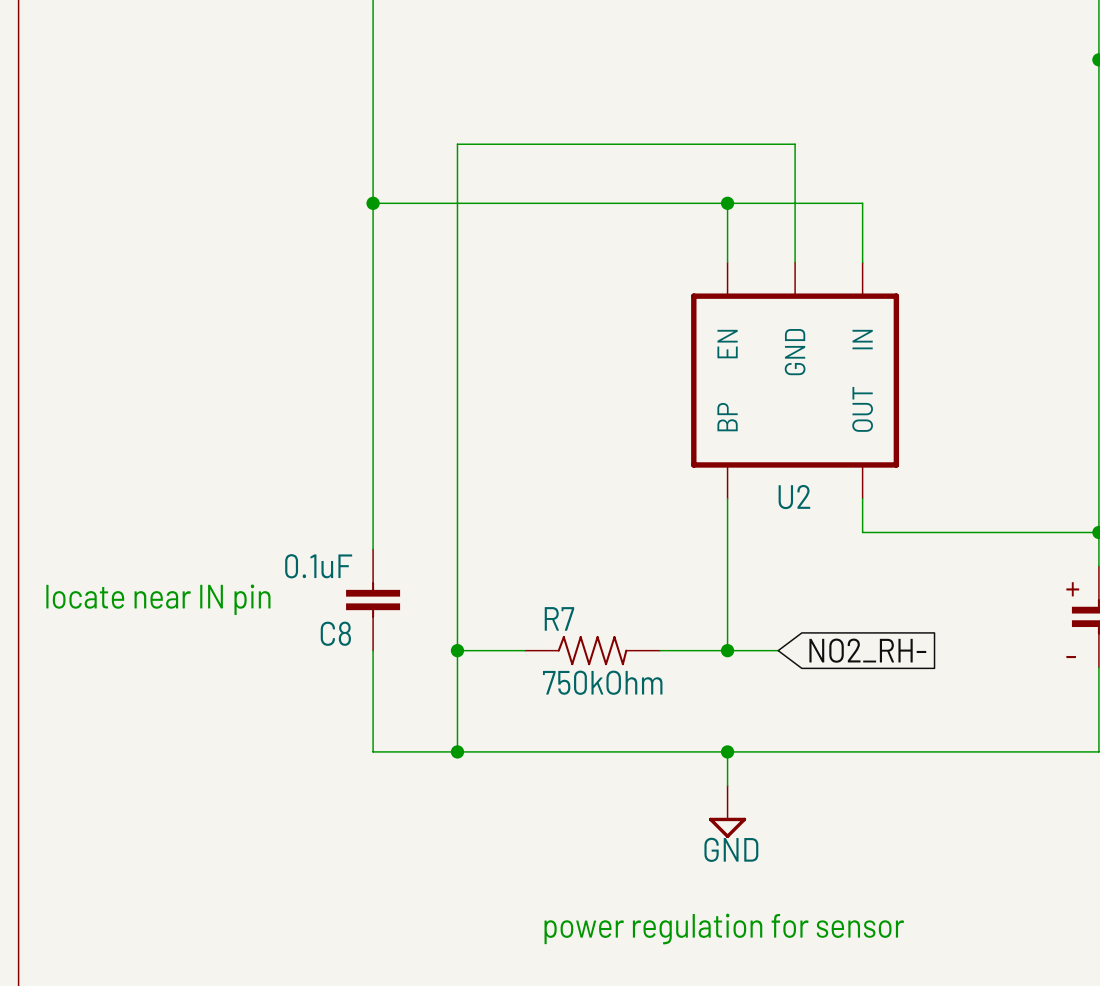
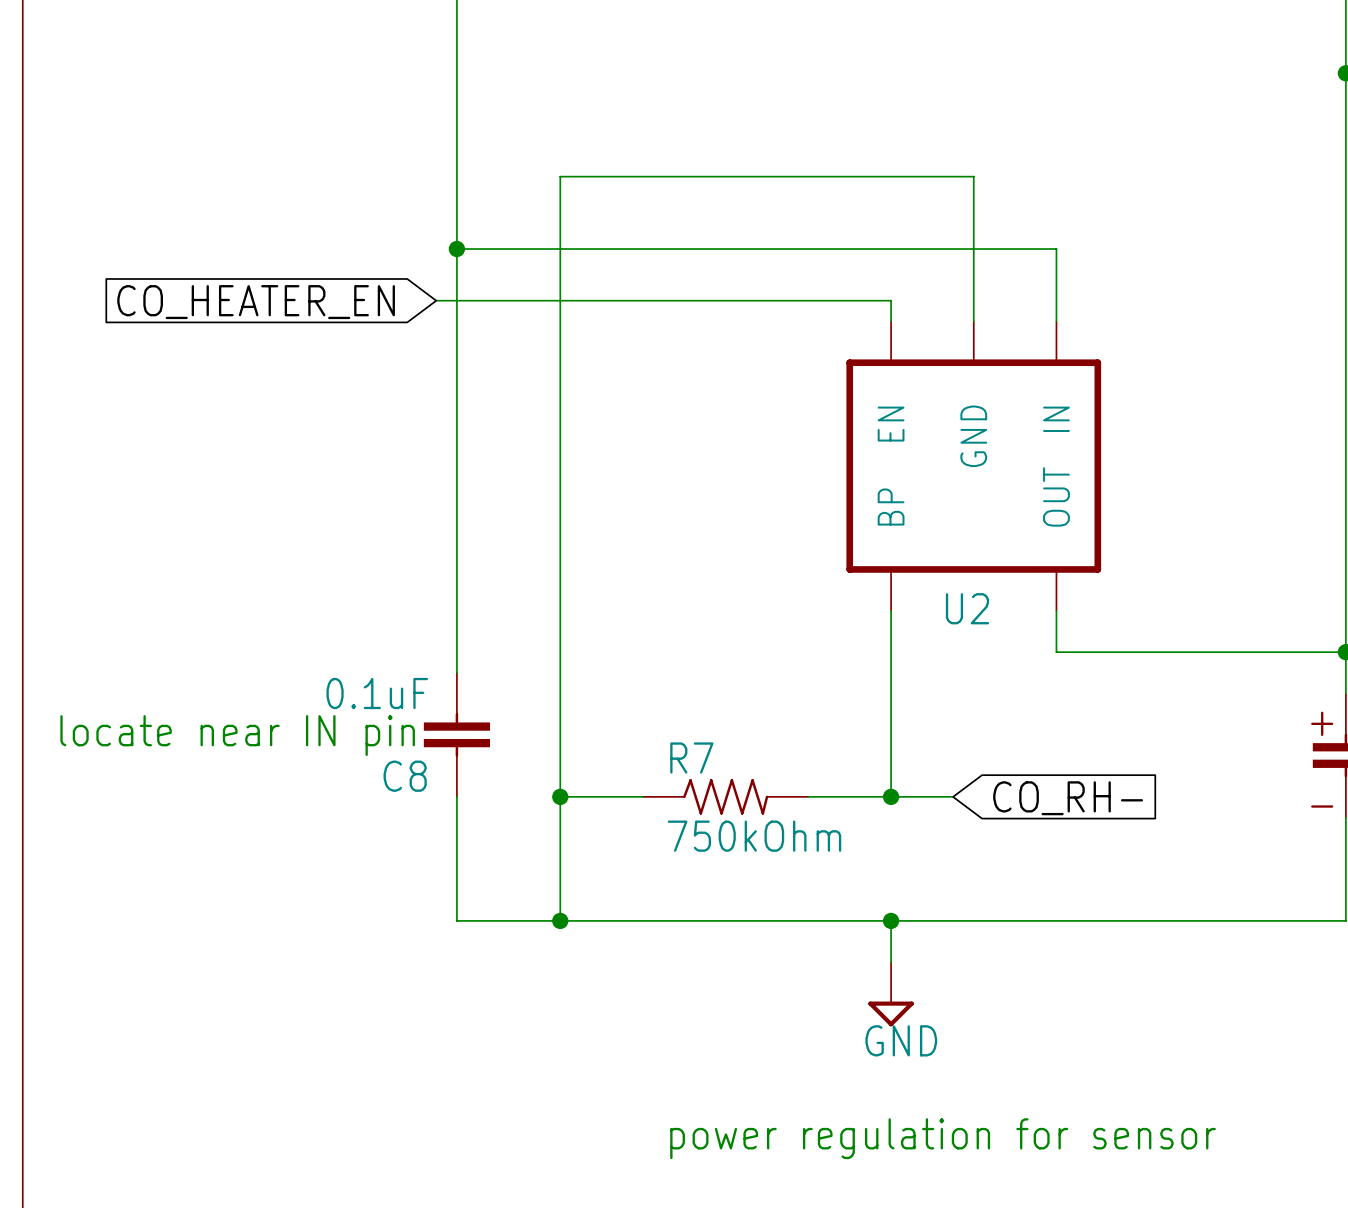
wire: (727, 203) (727, 245) -> (436, 300) (891, 300)
junction: (727, 203) -> none
global label: none -> CO_HEATER_EN (256, 302)
global label: NO2_RH- (867, 650) -> CO_RH- (1068, 798)

